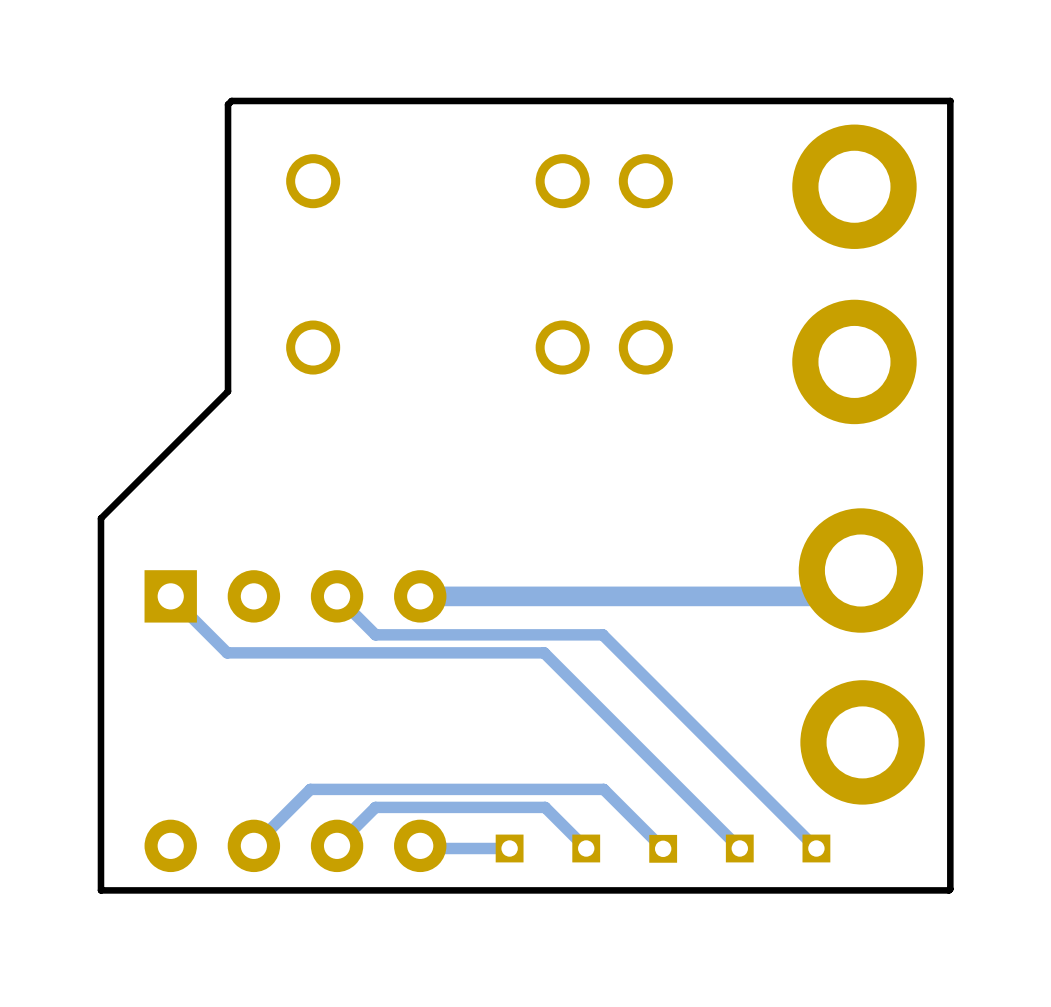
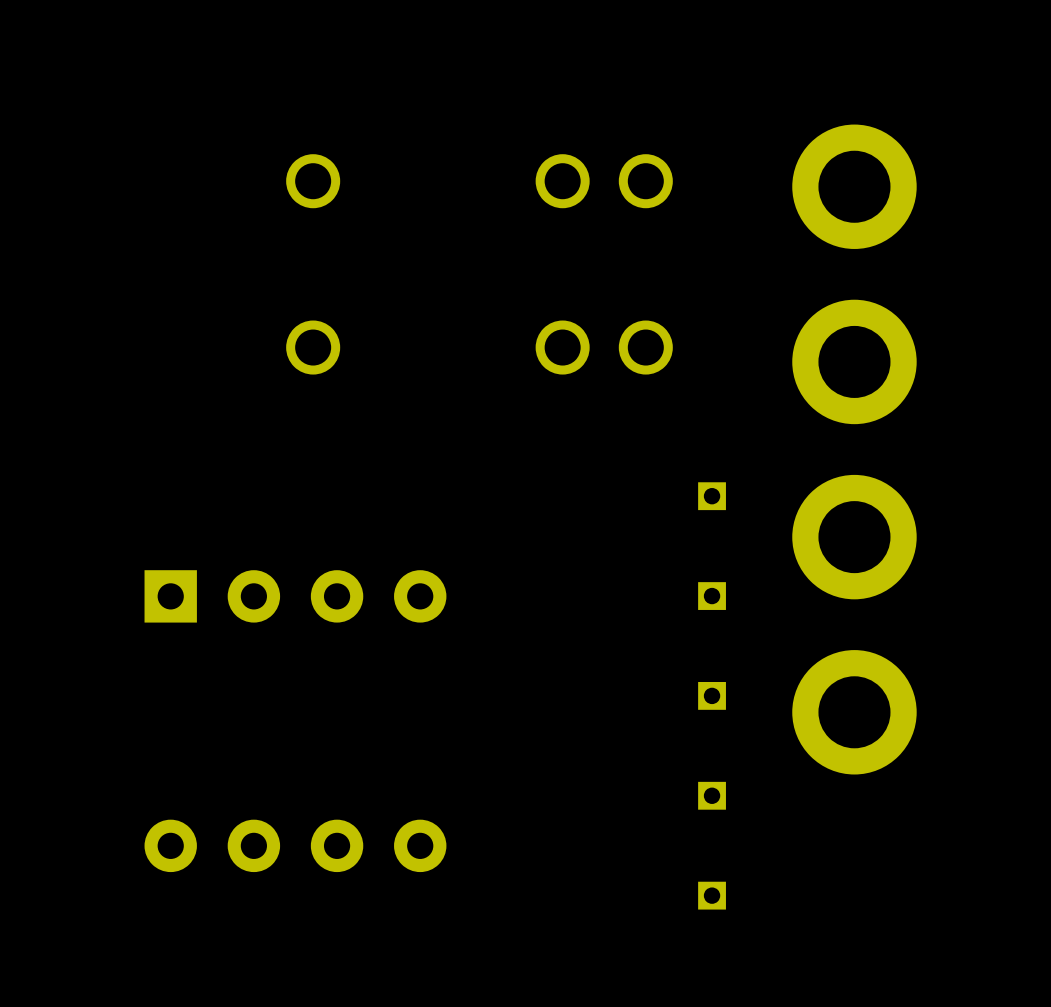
board edge: (950, 100) (231, 100) (228, 104) (228, 391) (100, 518) (100, 890) (949, 890) (950, 100) -> none
part: none -> (712, 496)
track: (860, 570) (835, 596) (420, 596) -> none
part position: (860, 570) -> (854, 537)
track: (170, 596) (227, 652) (544, 652) (739, 848) -> none
track: (337, 596) (375, 634) (602, 634) (816, 848) -> none
part: none -> (712, 596)
part: none -> (712, 695)
part position: (862, 742) -> (854, 712)
part: none -> (712, 795)
track: (253, 845) (310, 789) (603, 789) (663, 848) -> none
track: (337, 845) (375, 807) (545, 807) (586, 848) -> none
track: (420, 845) (422, 848) (509, 848) -> none
part: (509, 848) -> none
part: (586, 848) -> none
part: (663, 848) -> none
part: (739, 848) -> none
part: (816, 848) -> none
part: none -> (712, 895)

